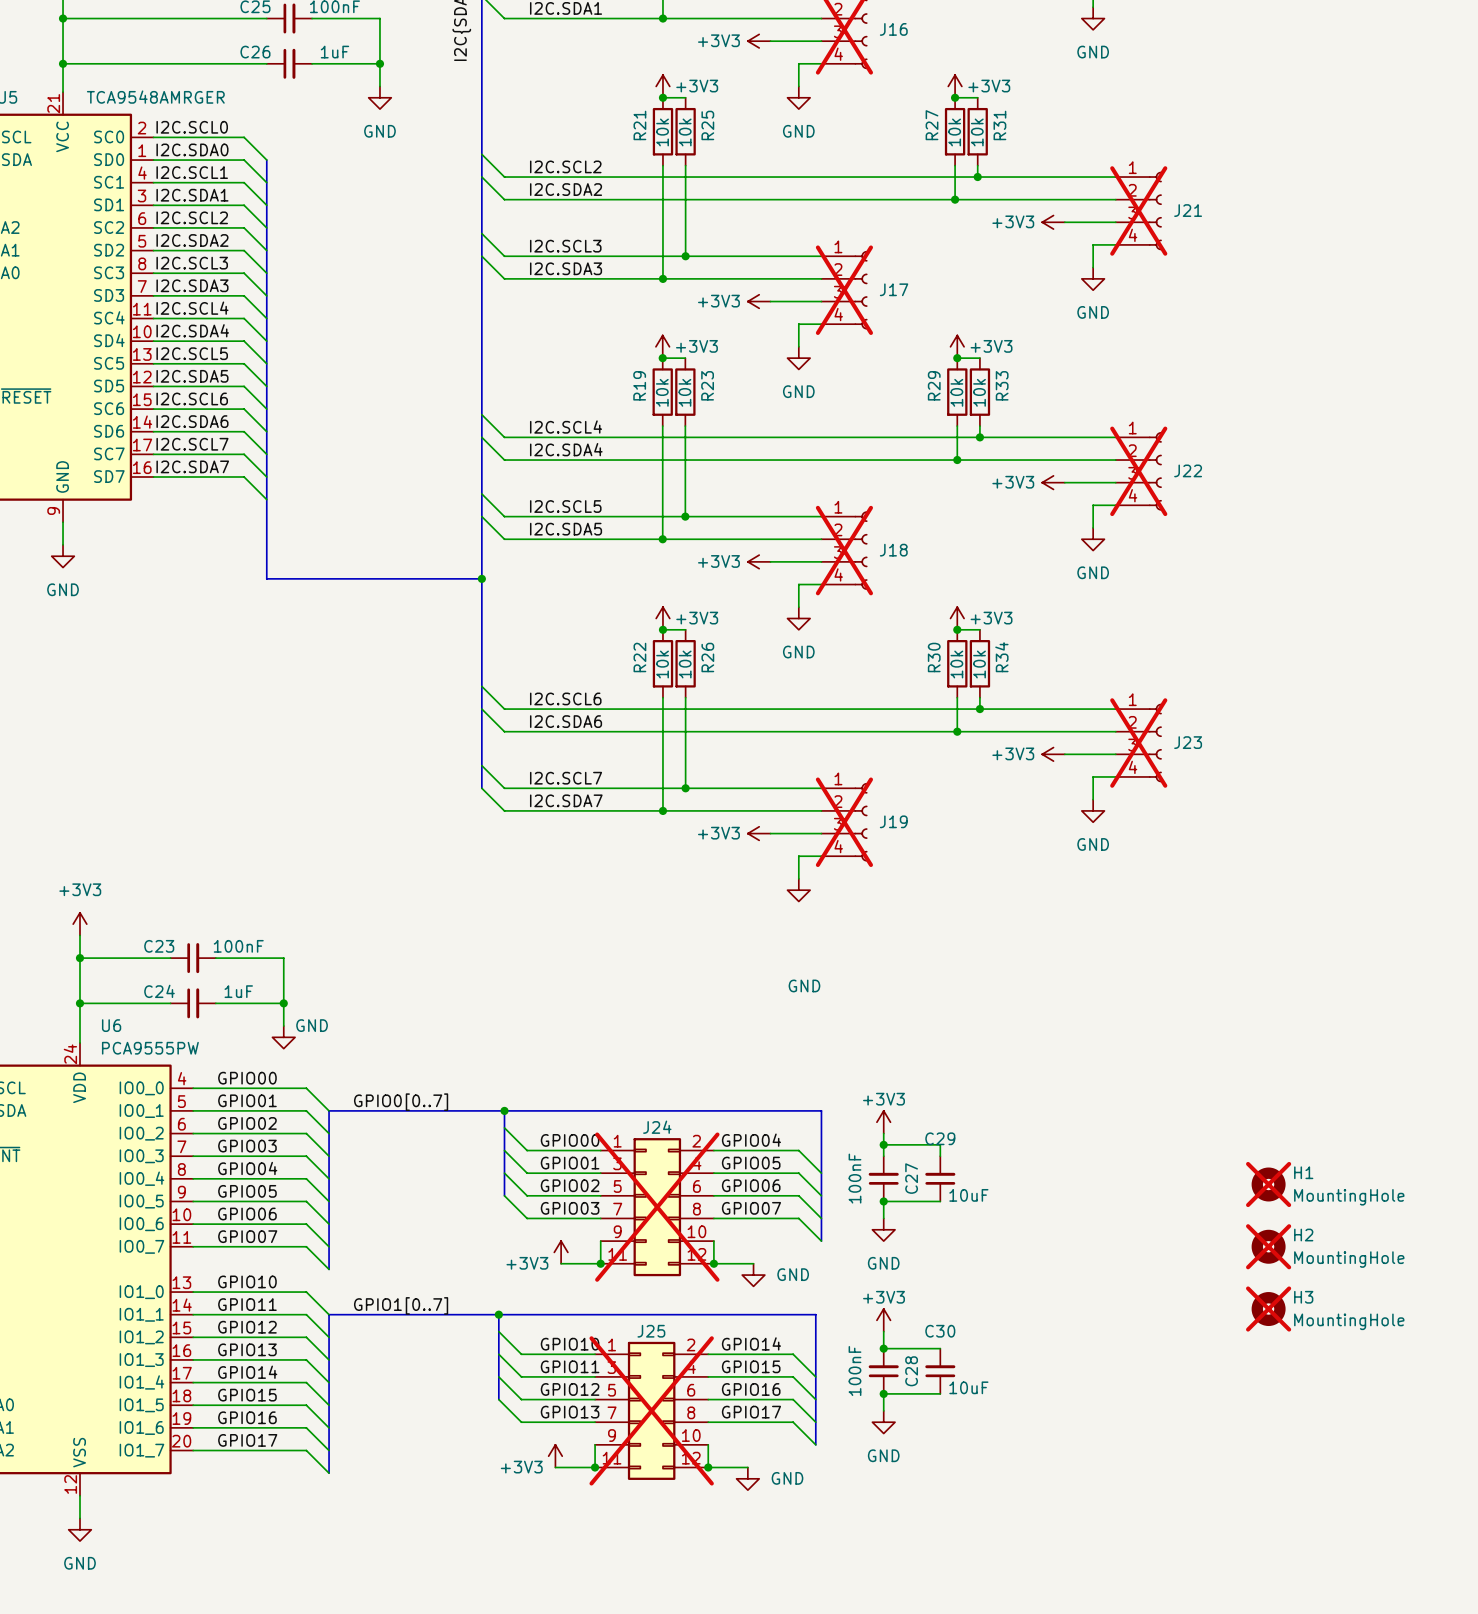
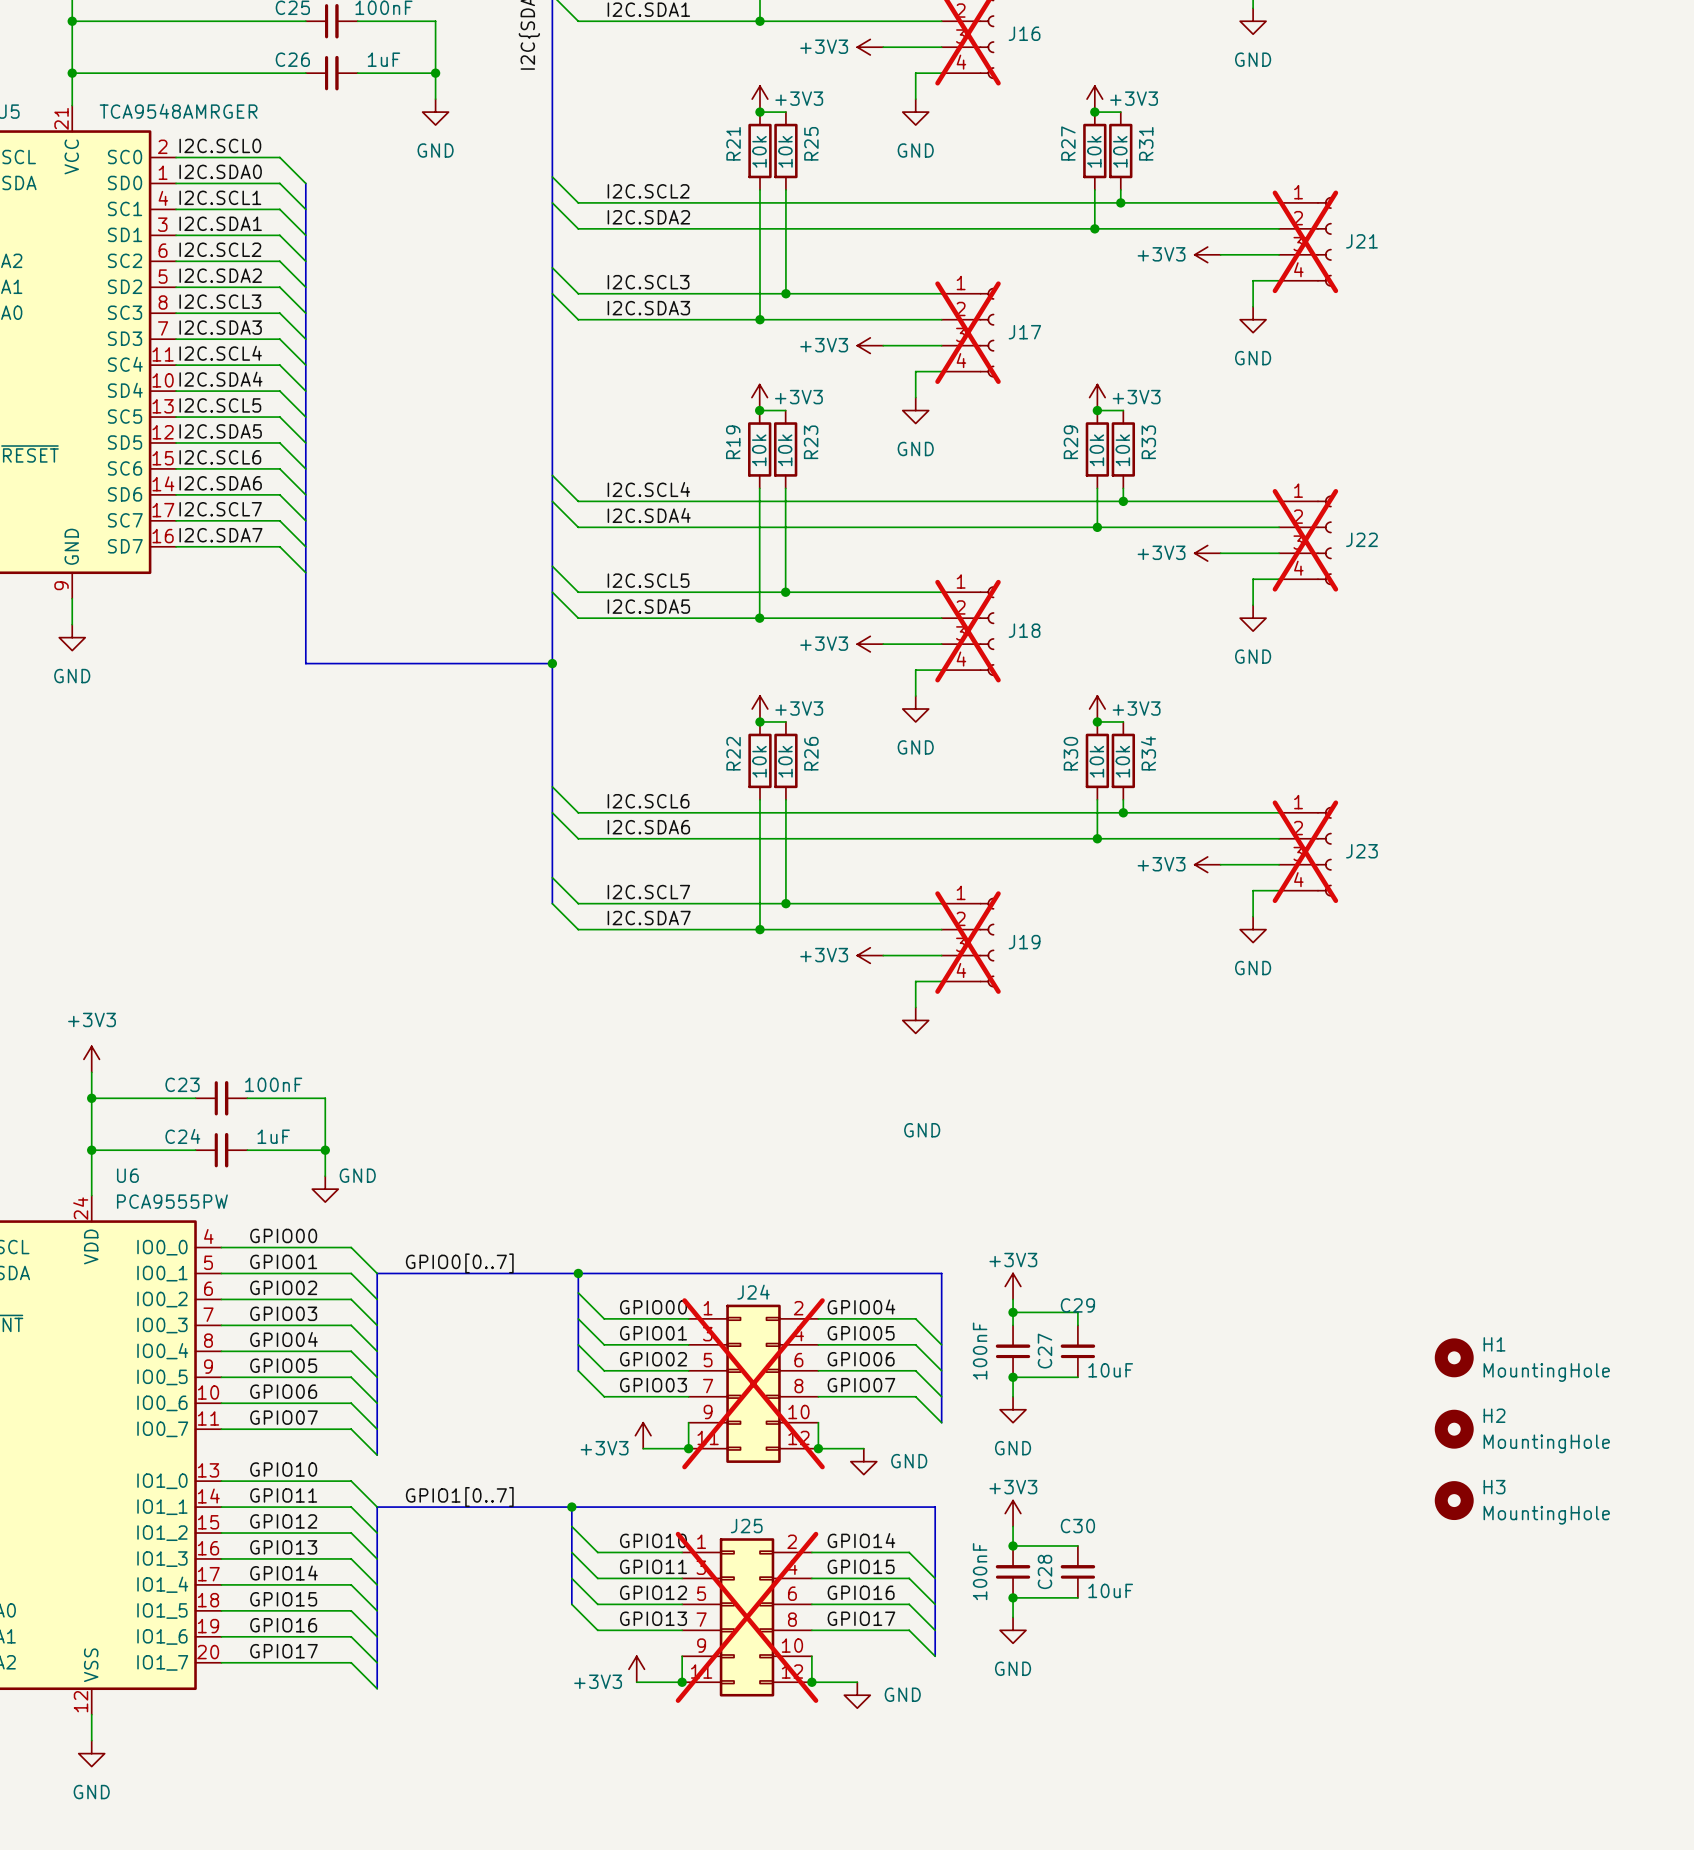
H1 do-not-place cross: (1268, 1184) -> none
H2 do-not-place cross: (1268, 1246) -> none
H3 do-not-place cross: (1268, 1309) -> none

